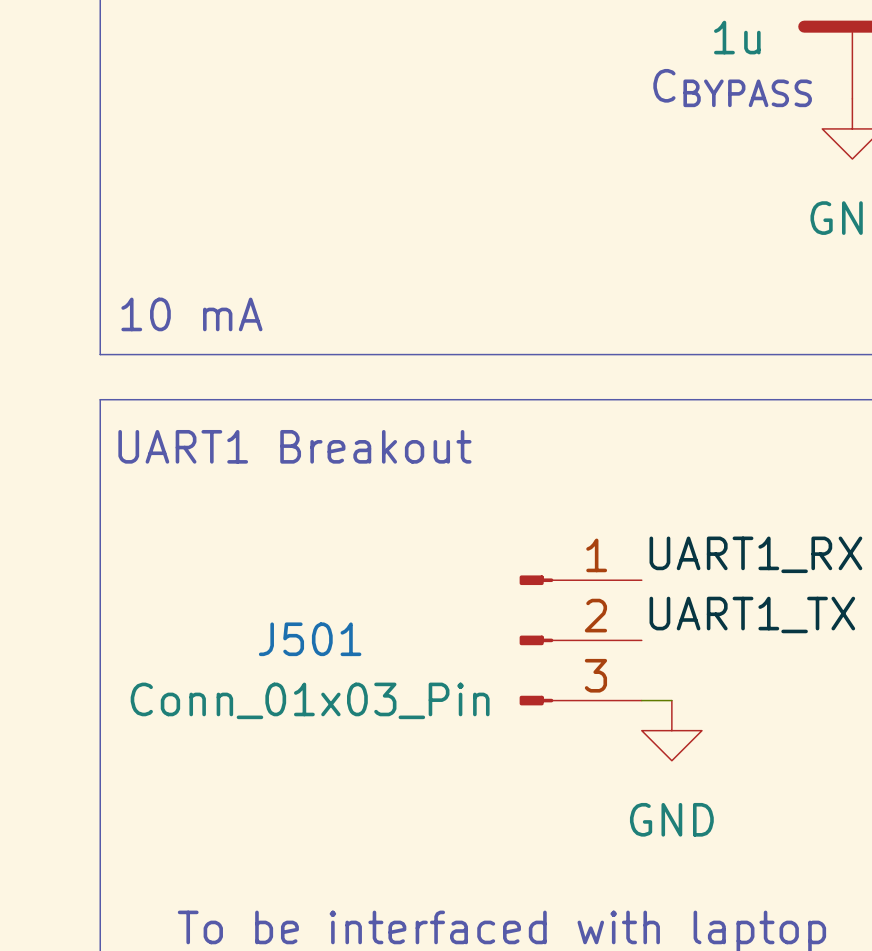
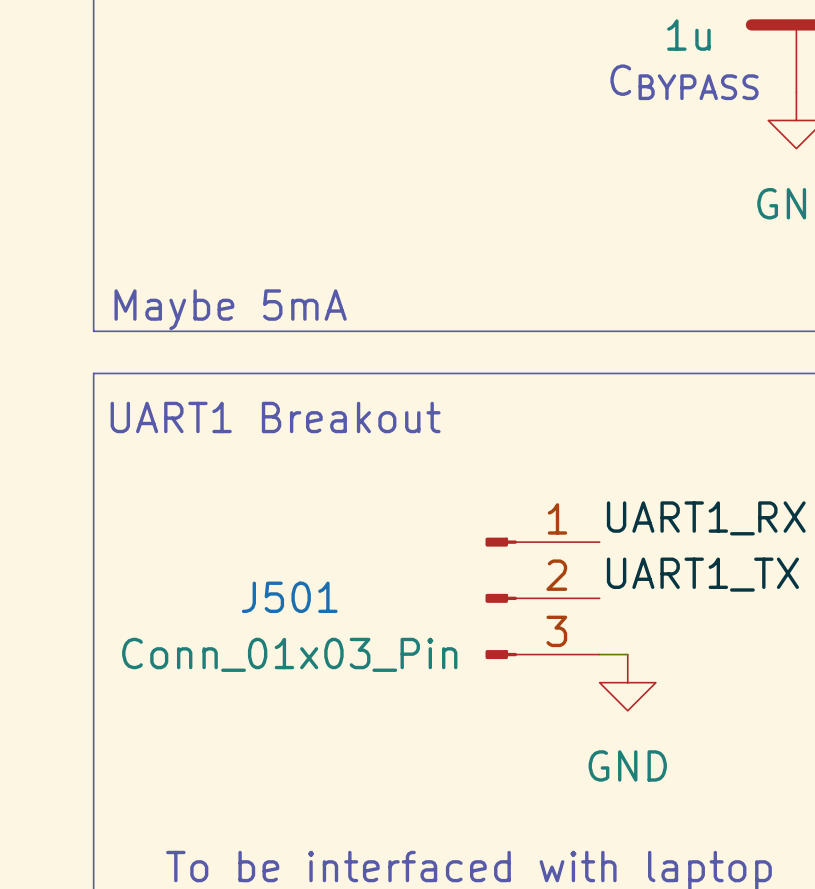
text: 10 mA (191, 314) -> none
text: none -> Maybe 5mA (230, 309)

